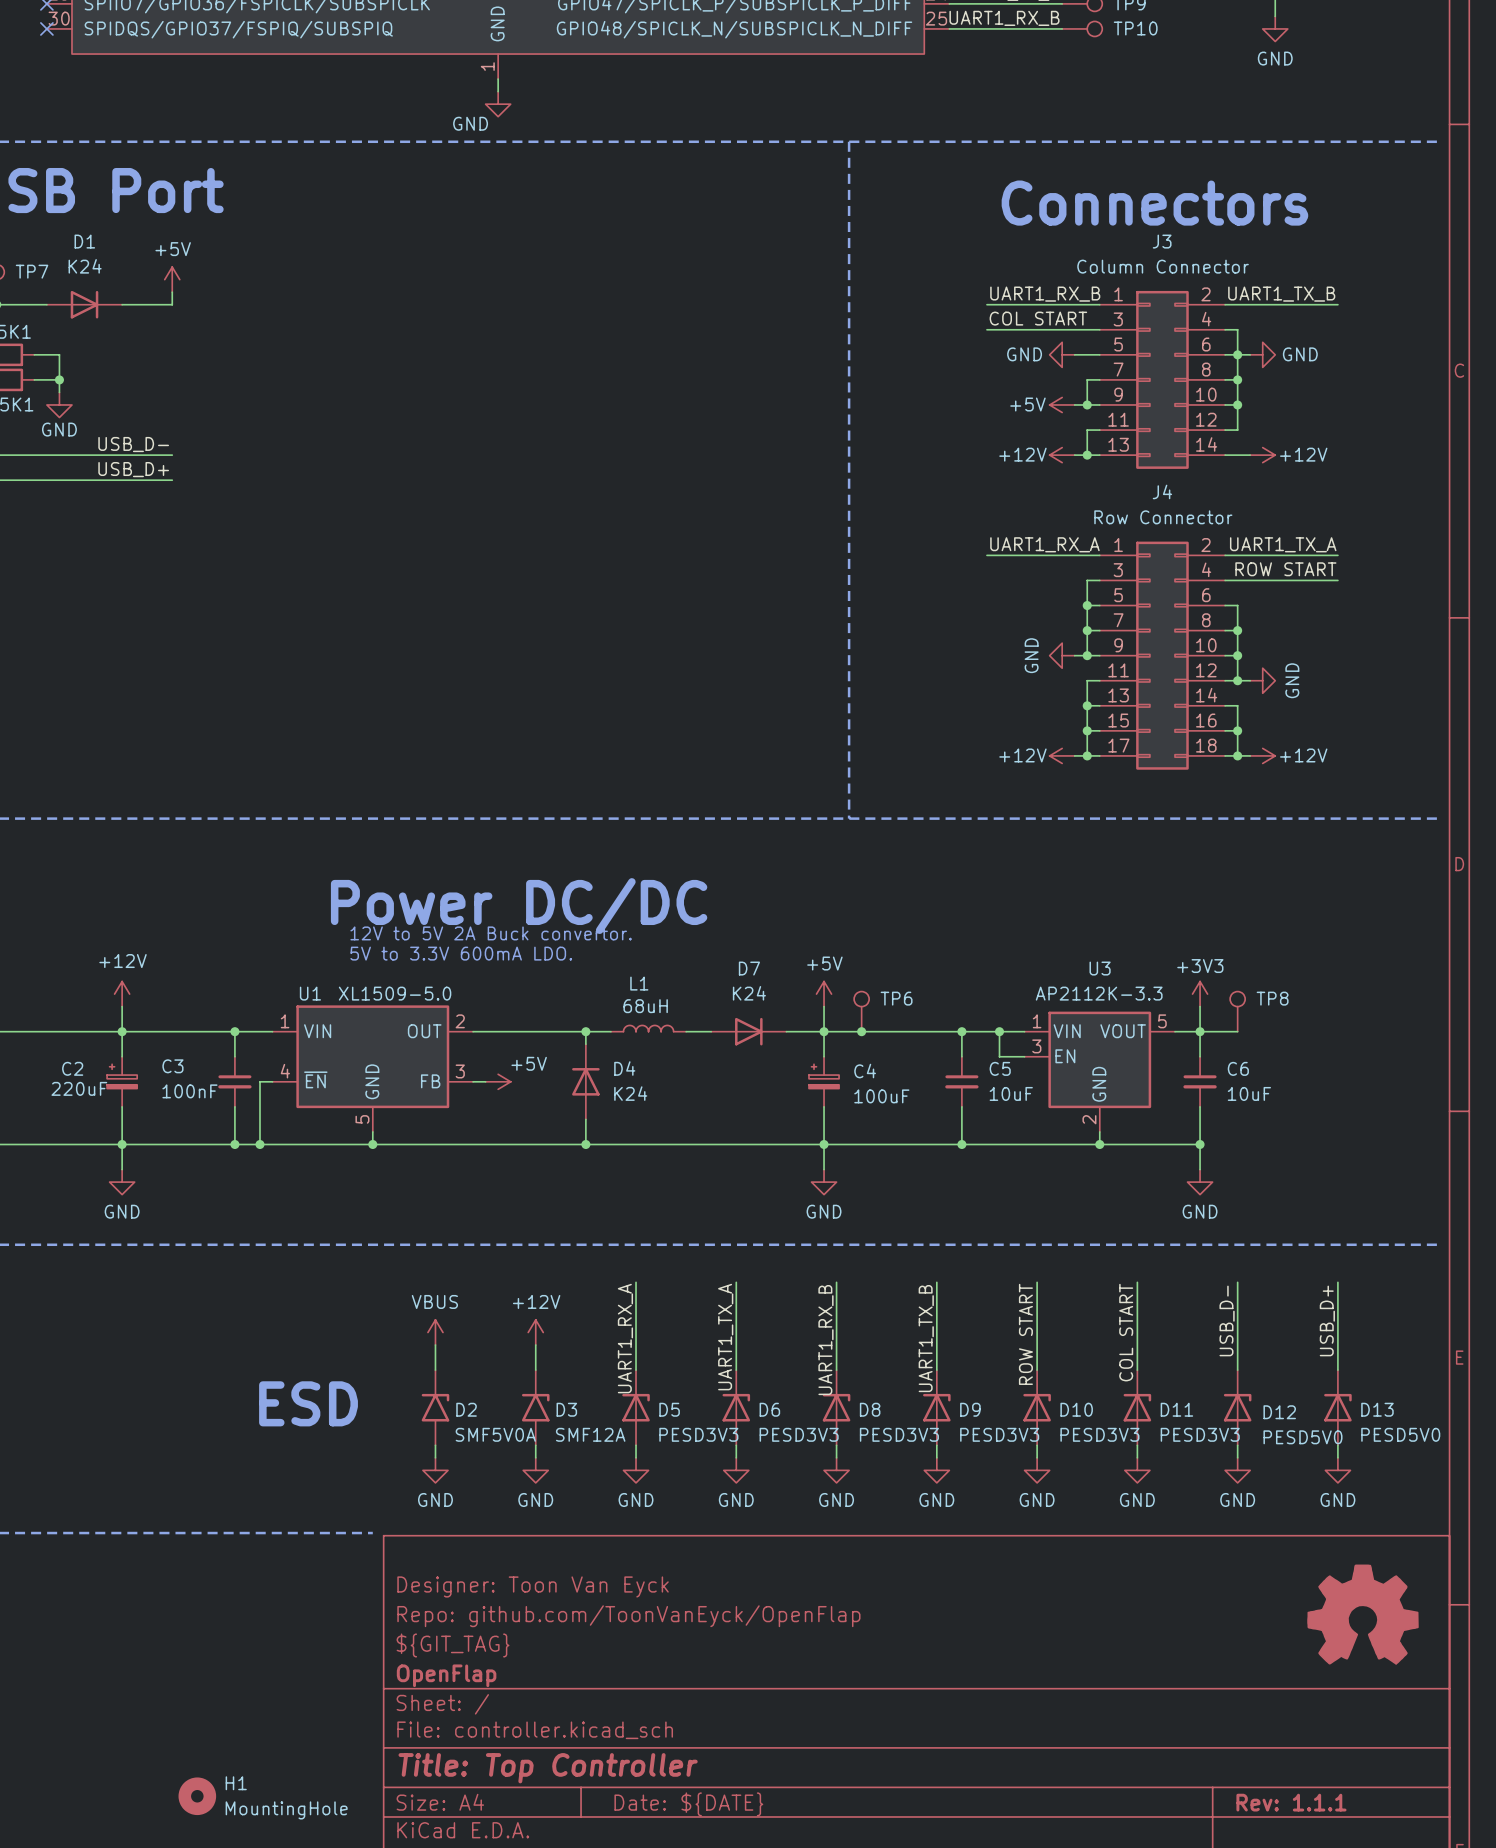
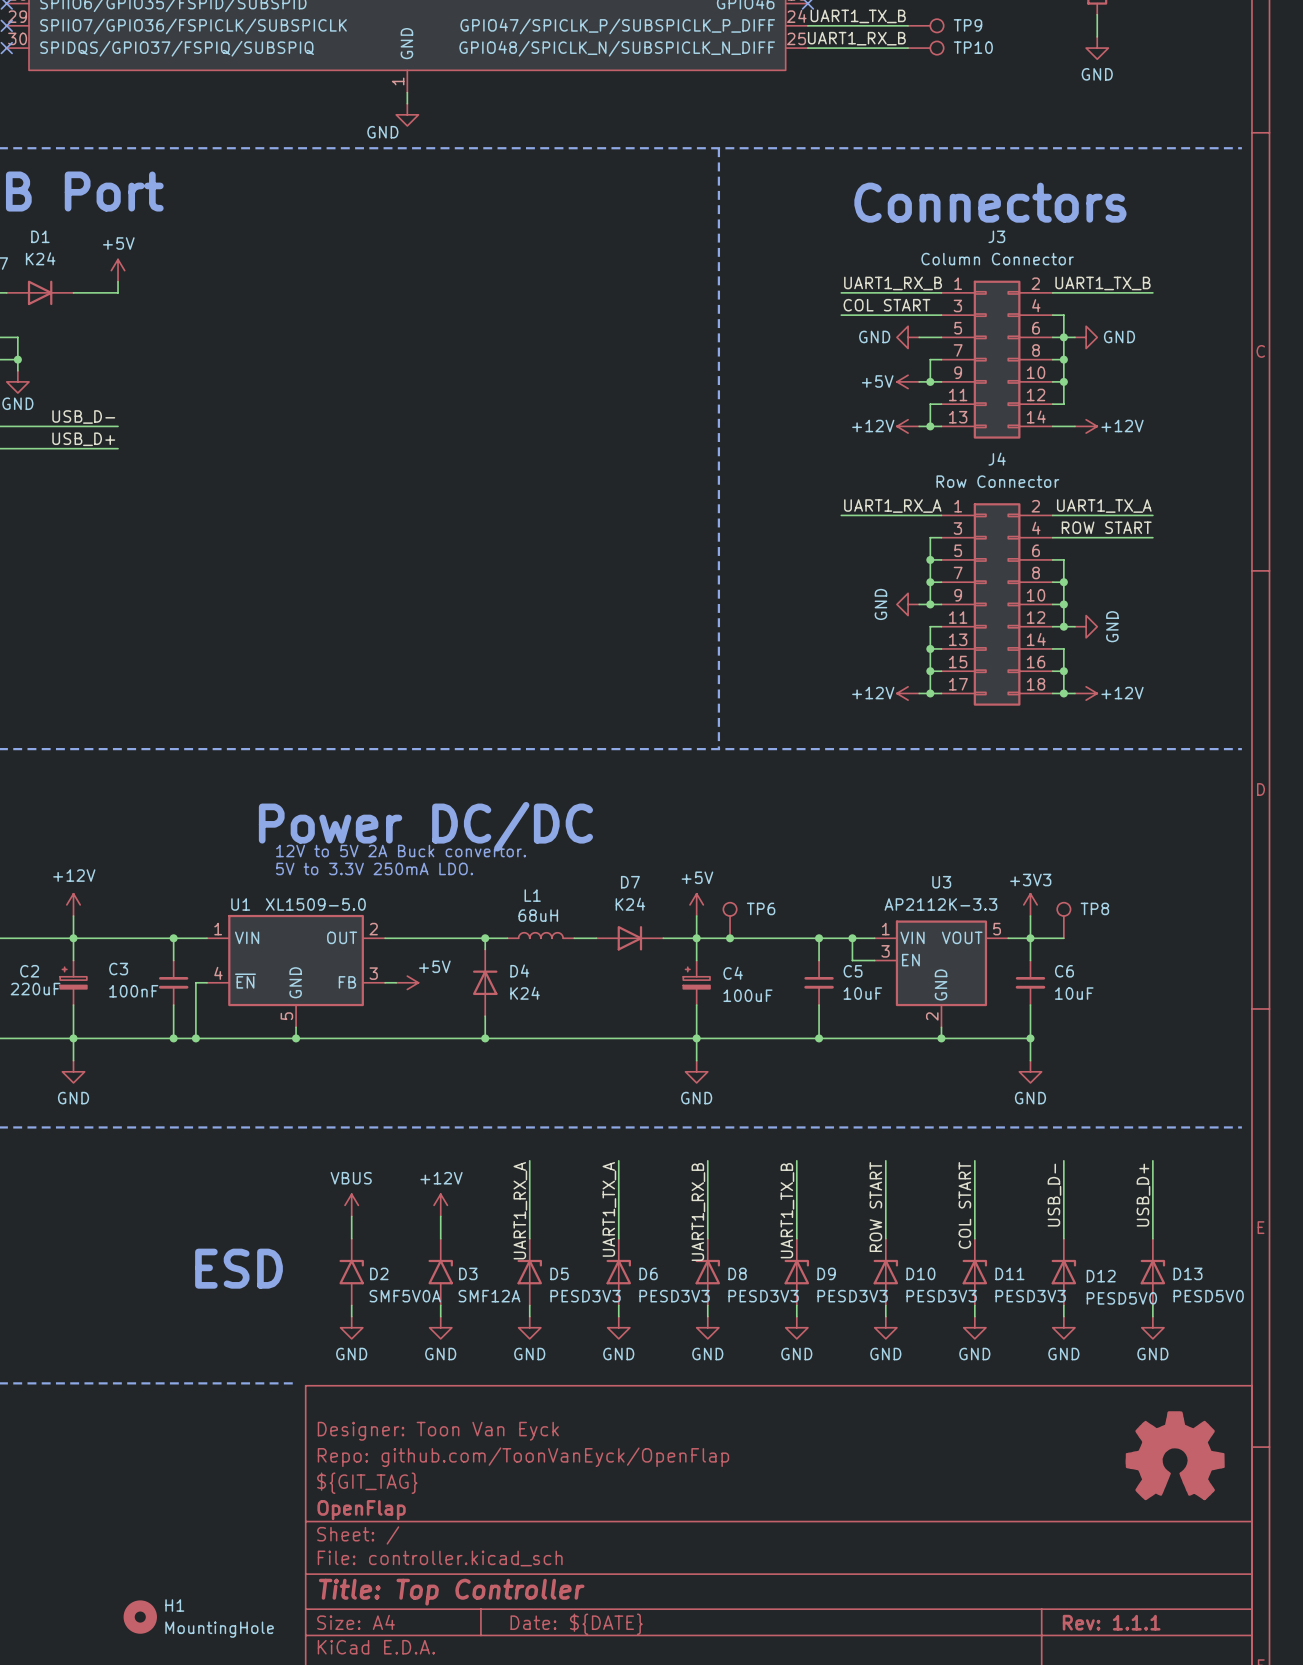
text: 5V to 3.3V 600mA LDO. (461, 953) -> 5V to 3.3V 250mA LDO. (374, 868)

